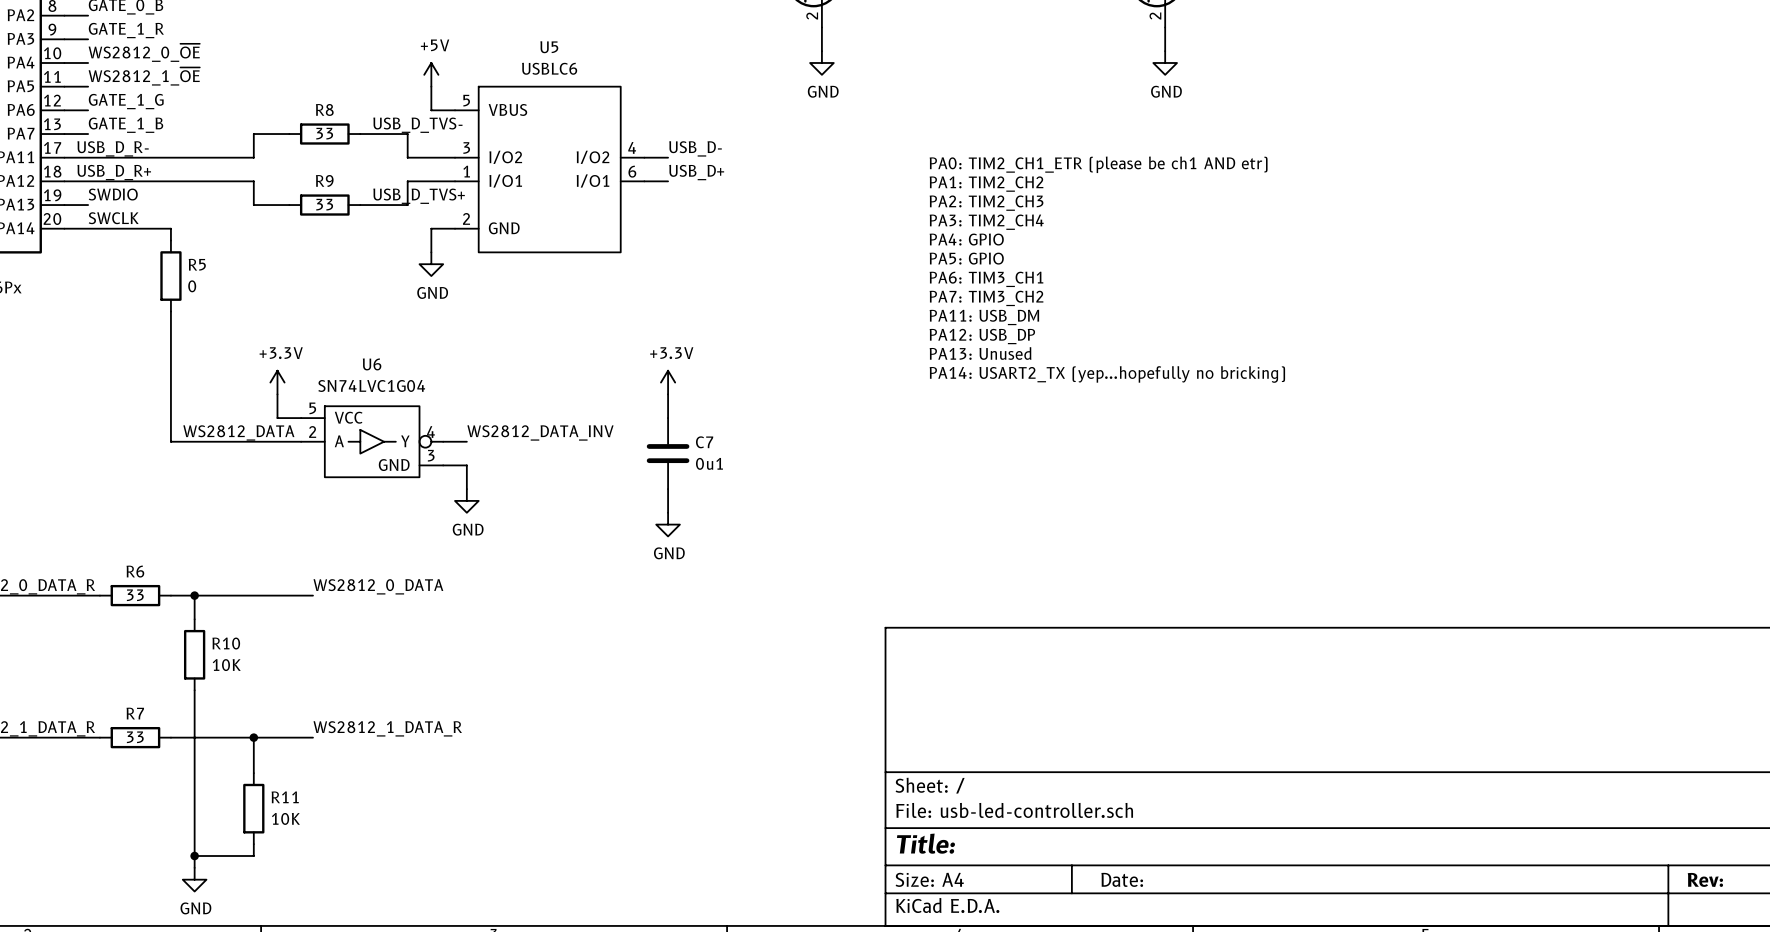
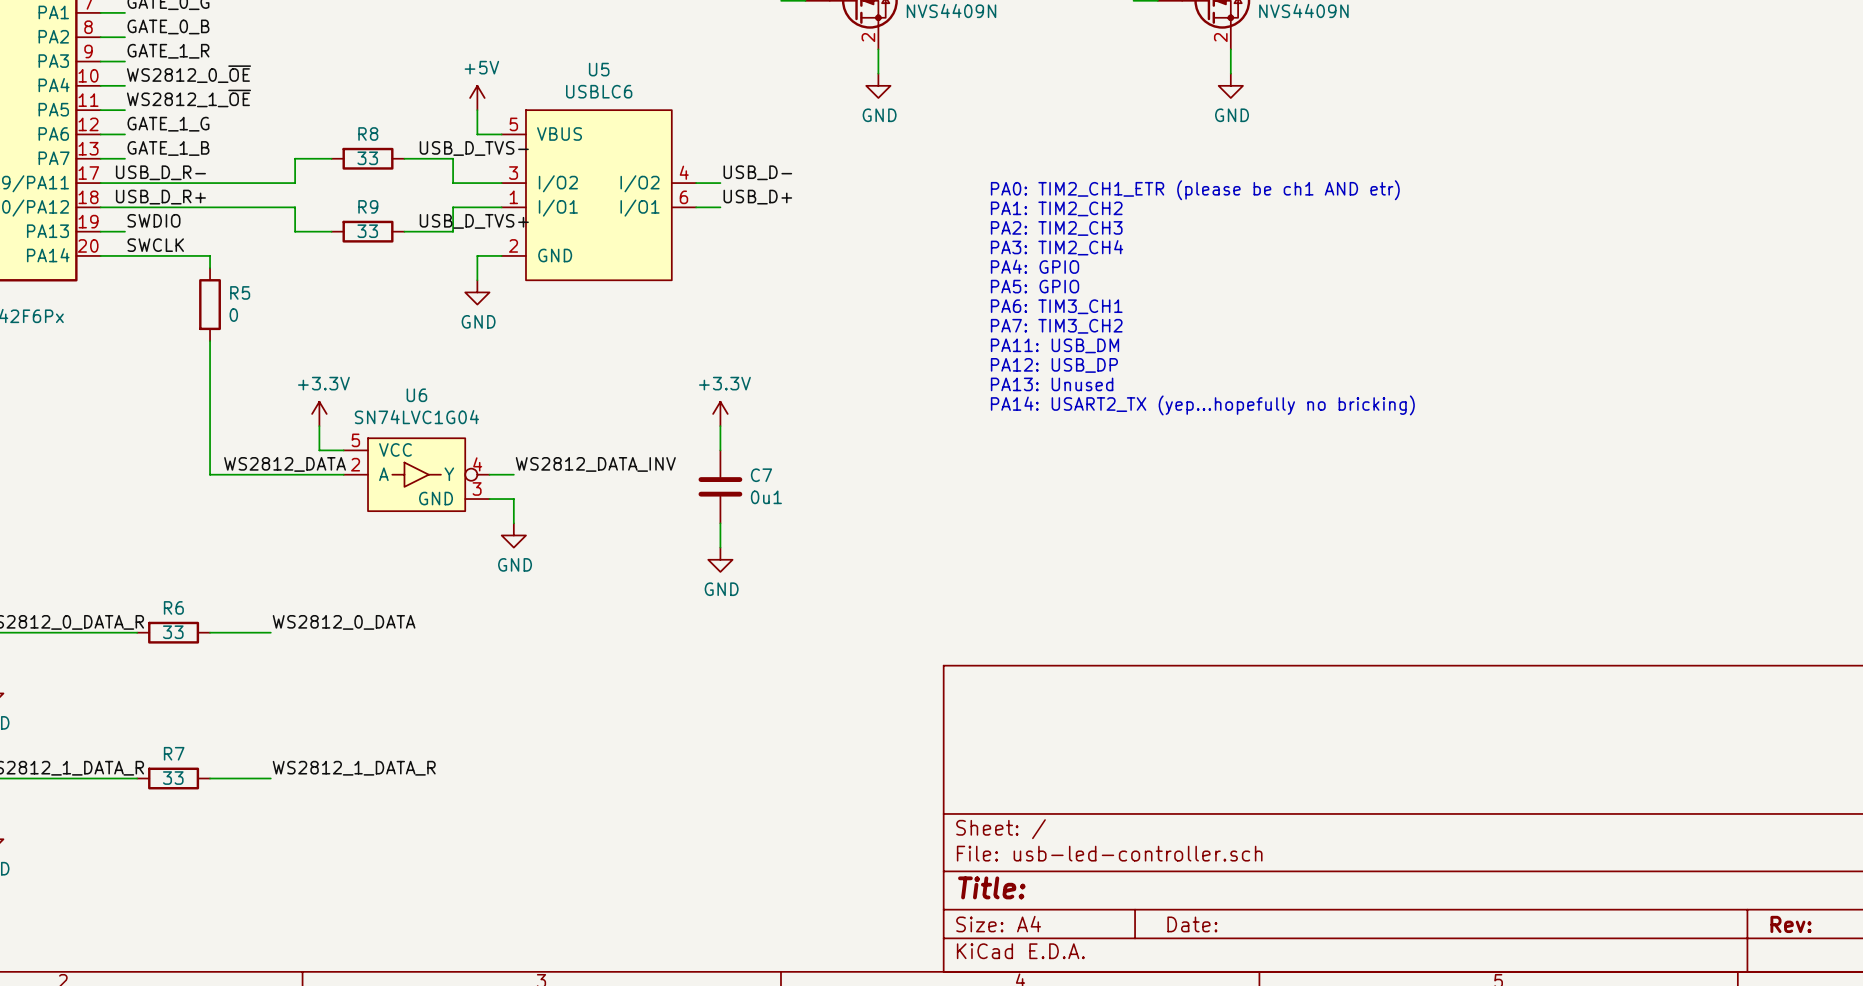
label position: WS2812_0_DATA (378, 586) -> WS2812_0_DATA (344, 622)
wire: (194, 595) (194, 619) -> none
junction: (194, 595) -> none
wire: (230, 595) (312, 595) -> none
R10: 10K (194, 654) -> none
wire: (194, 690) (194, 867) -> none
label position: WS2812_1_DATA_R (387, 728) -> WS2812_1_DATA_R (354, 768)
wire: (230, 737) (312, 737) -> none
wire: (253, 737) (253, 773) -> none
junction: (253, 737) -> none
R11: 10K (253, 808) -> none
wire: (253, 844) (253, 856) (194, 856) -> none
junction: (194, 856) -> none
power symbol: GND (194, 879) -> none

